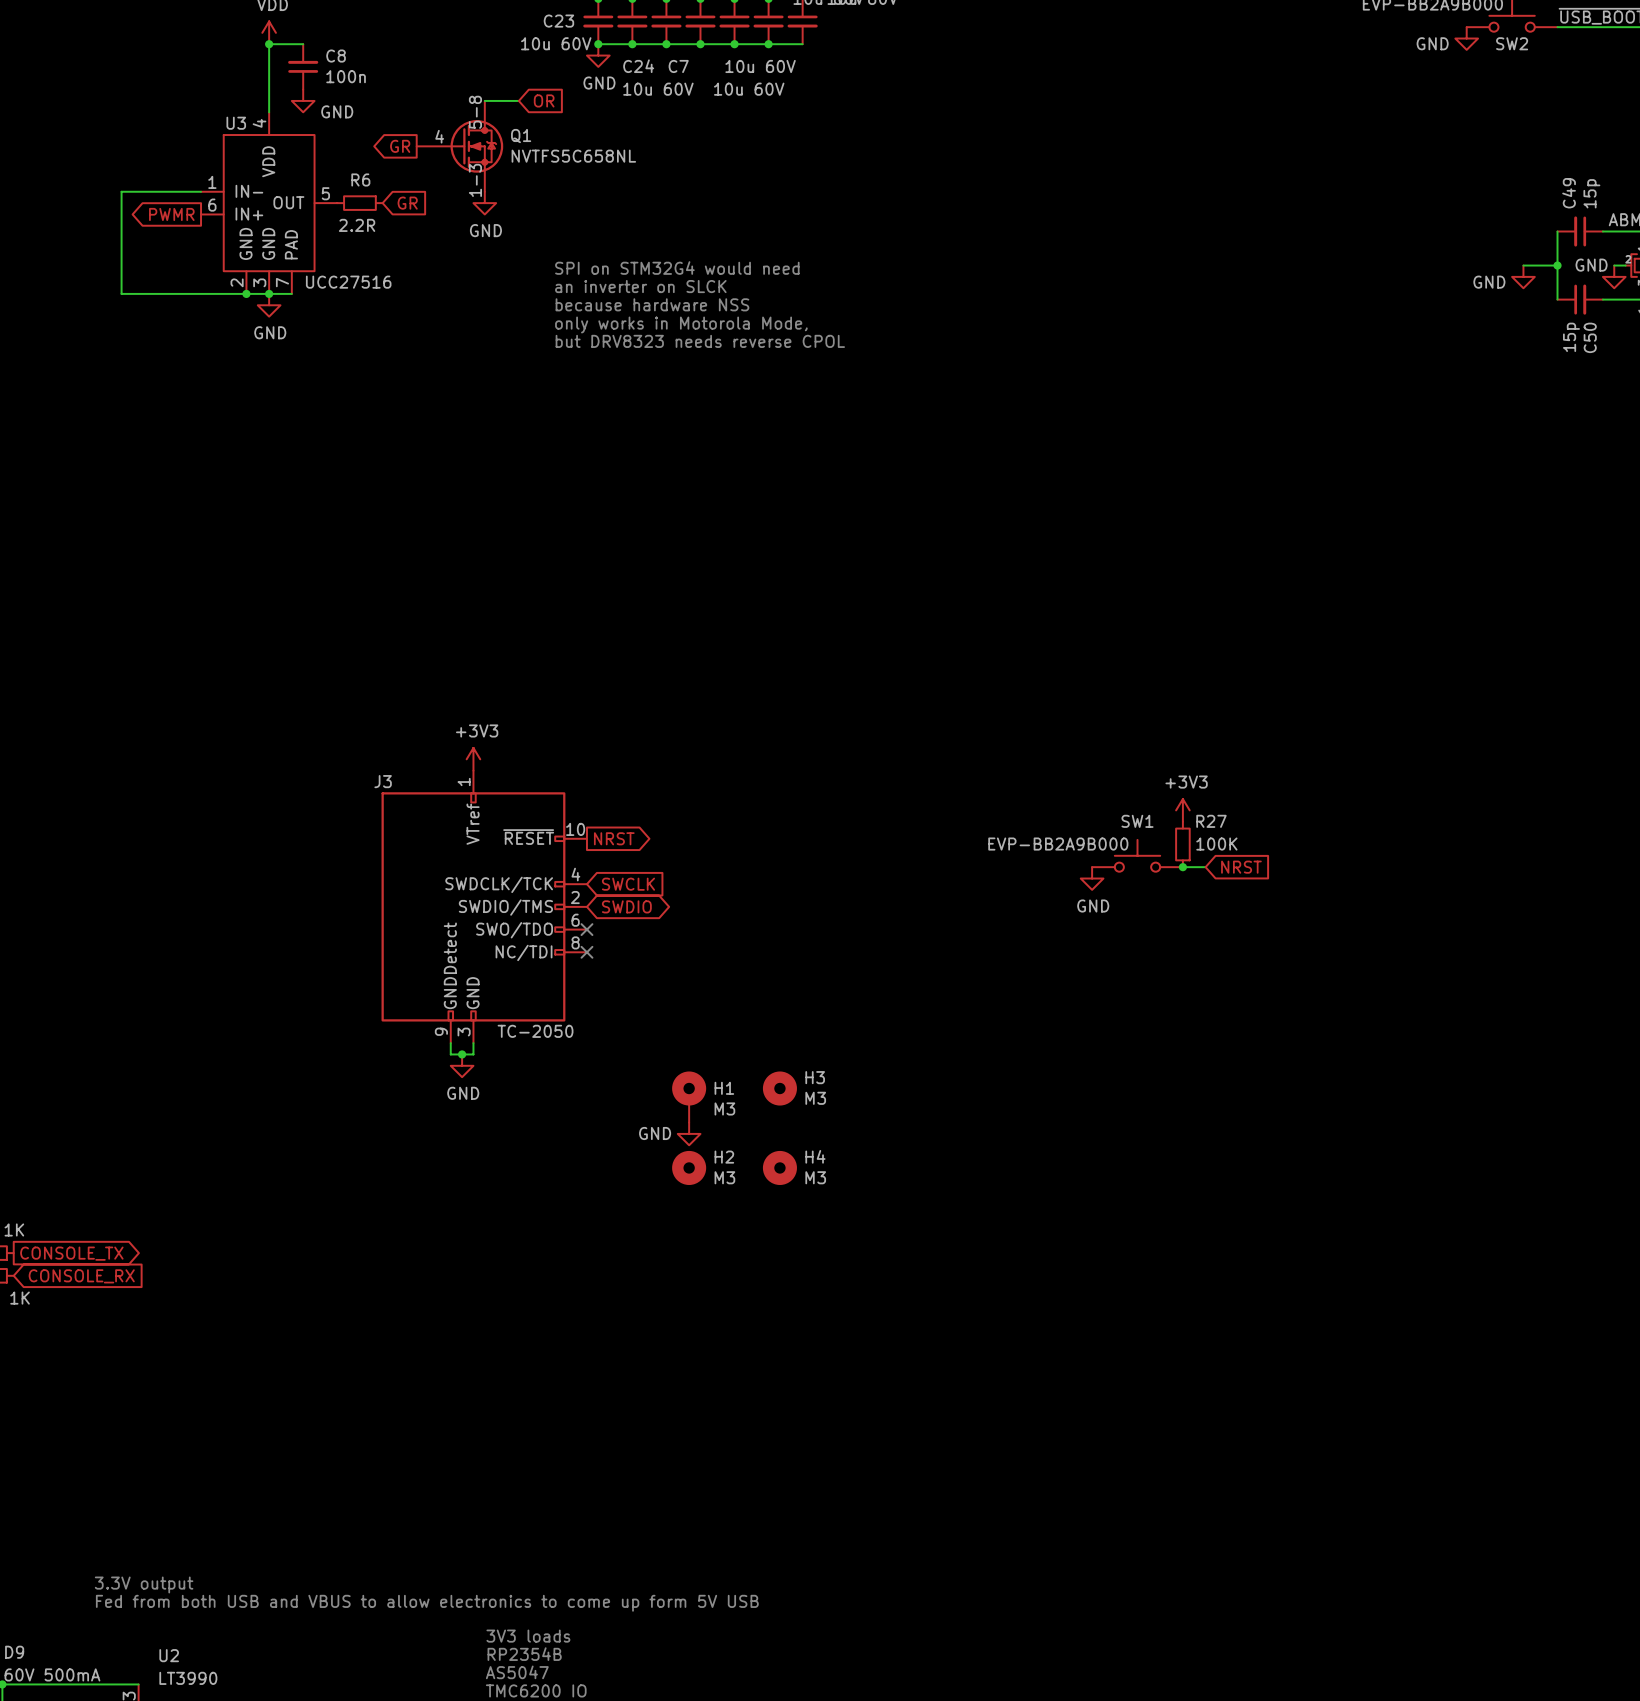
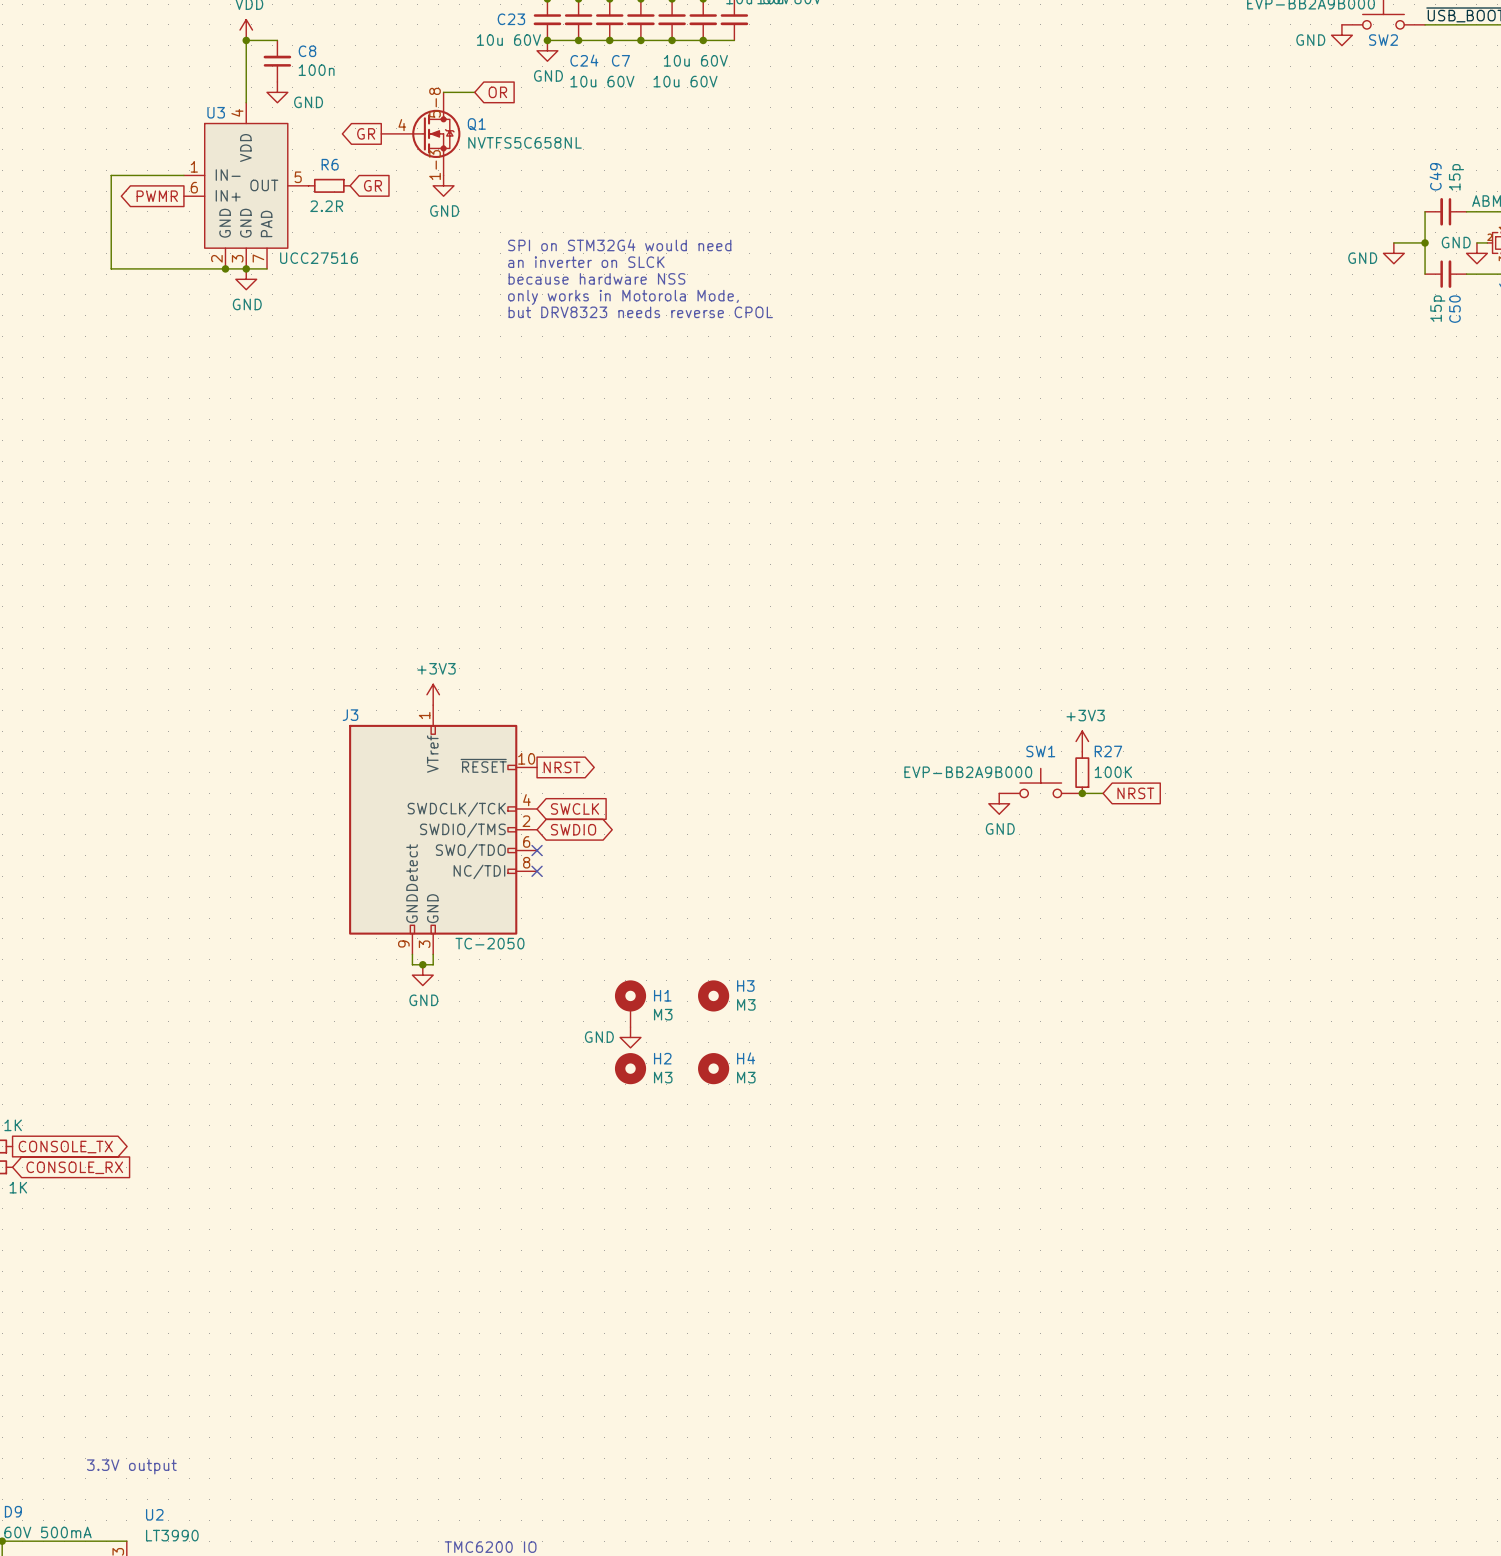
text: 3.3V output (144, 1584) -> none
text: Fed from both USB and VBUS to allow electronics to come up form 5V USB (427, 1603) -> 3.3V output (131, 1466)
text: 3V3 loads (528, 1636) -> none
text: RP2354B (524, 1654) -> none
text: AS5047 (517, 1672) -> none

